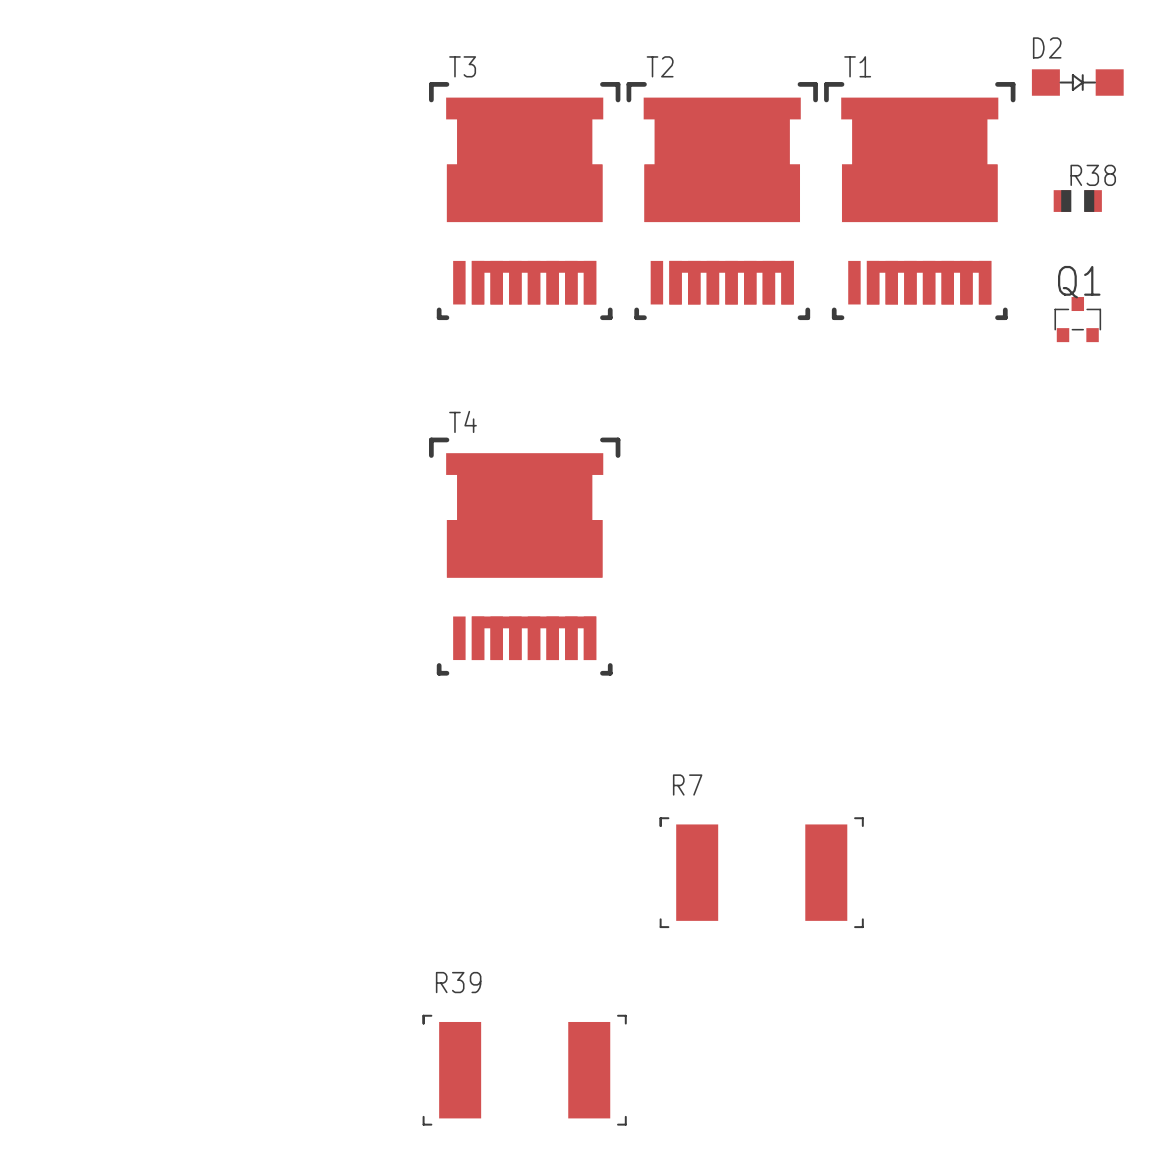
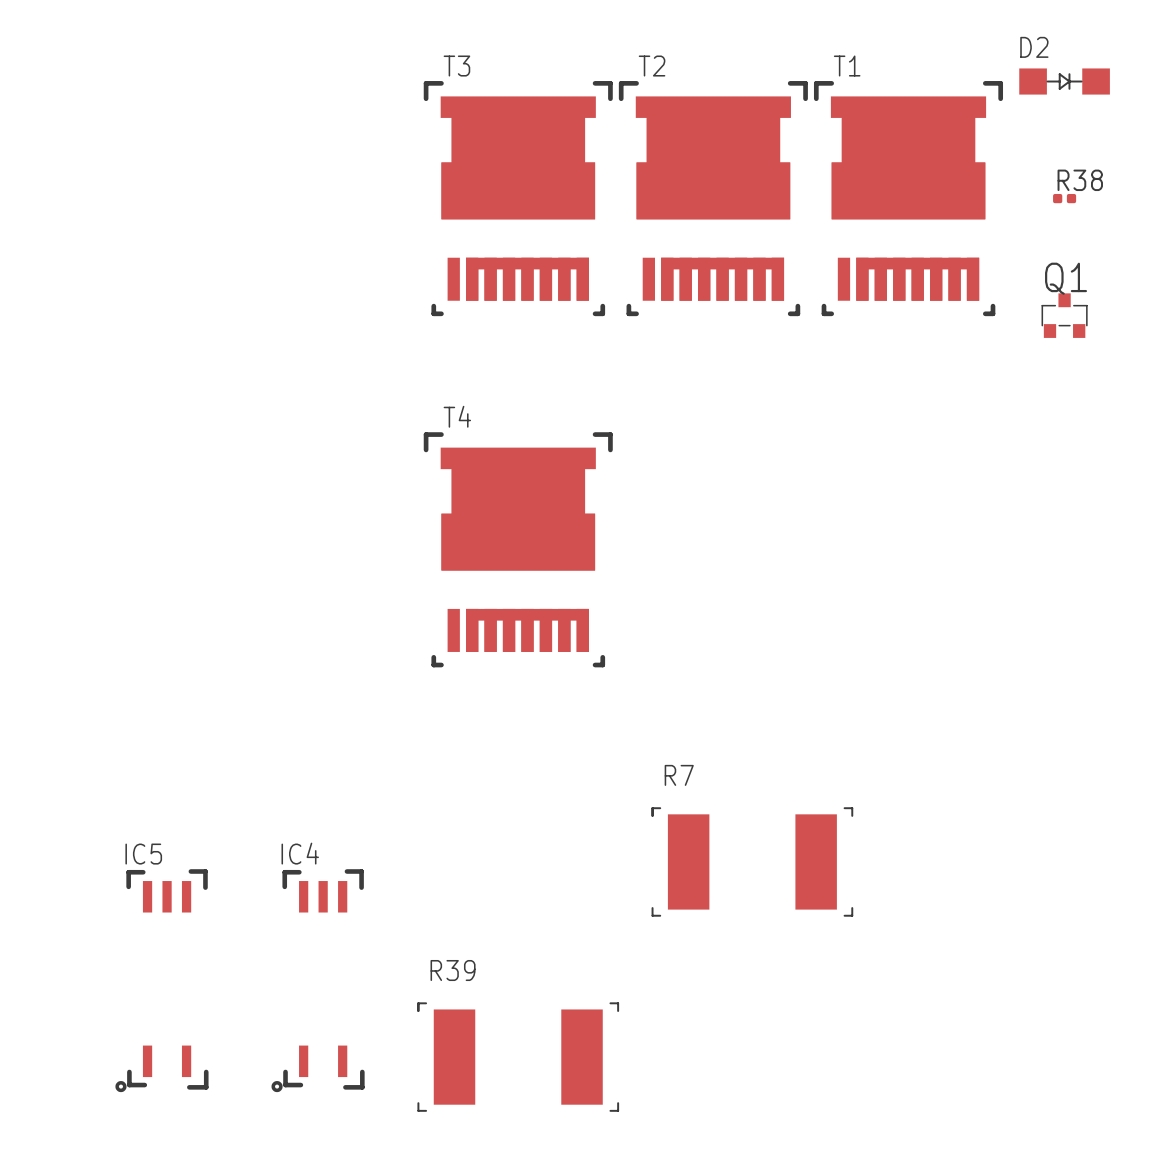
R38 footprint: [1053, 190, 1102, 212] -> [1053, 193, 1077, 204]
IC5: none -> (161, 980)
IC4: none -> (318, 980)

